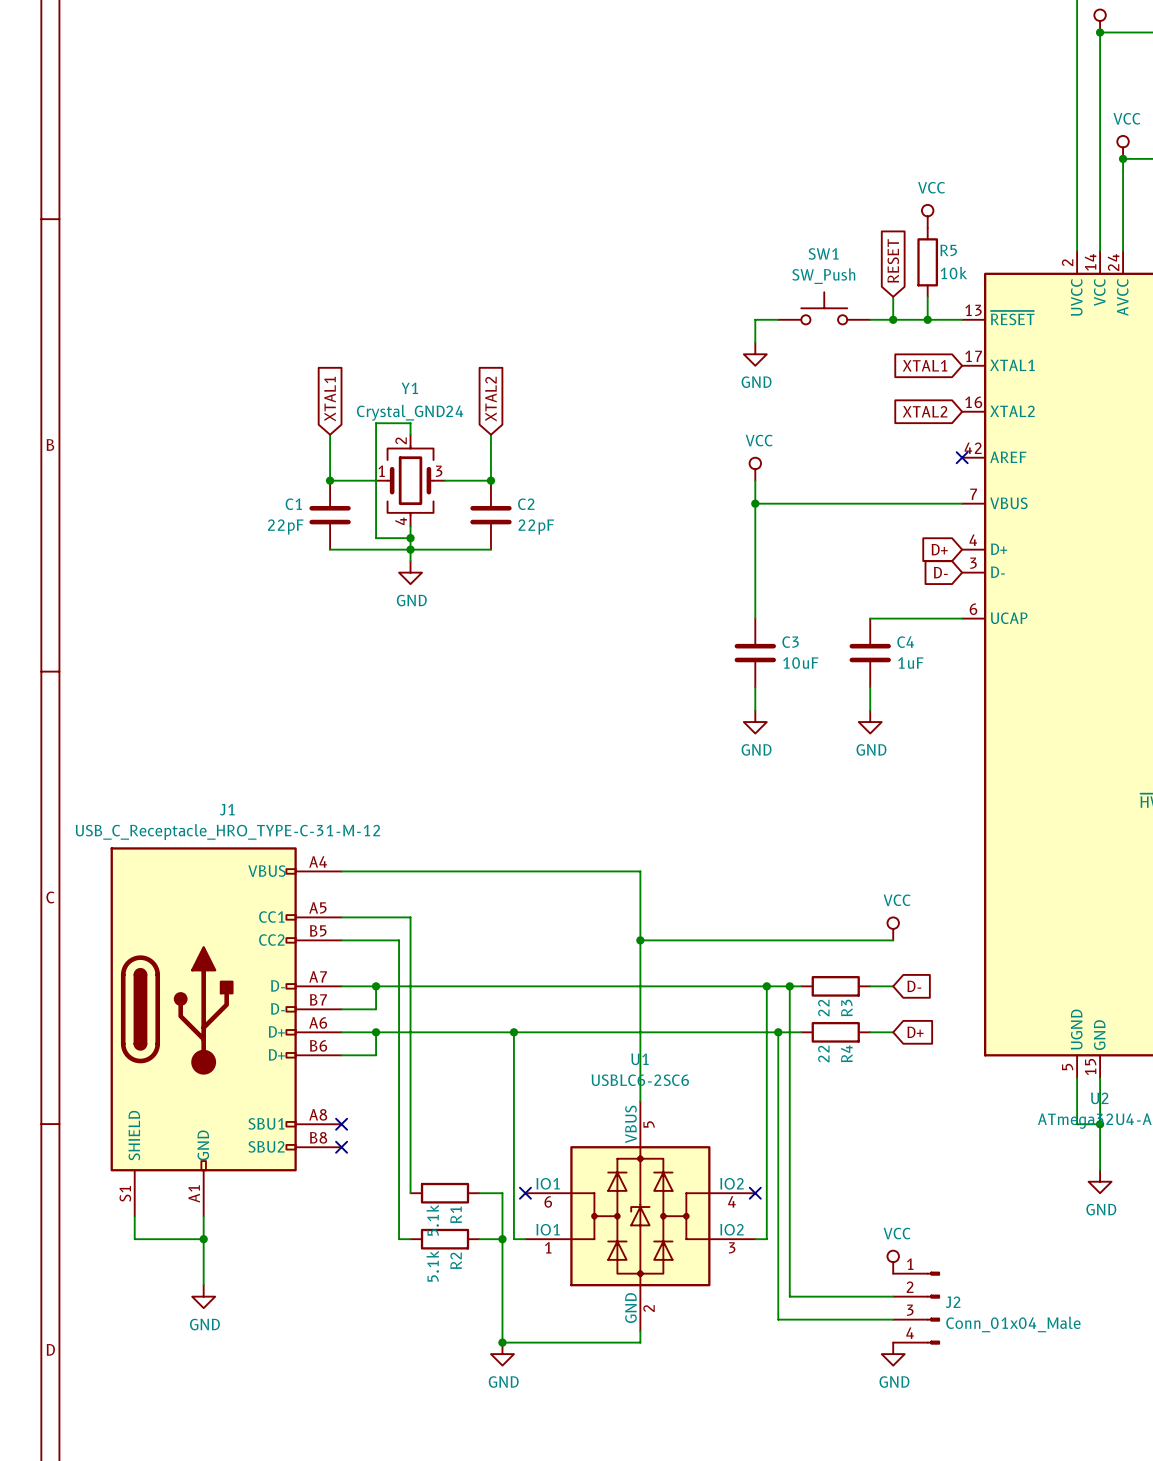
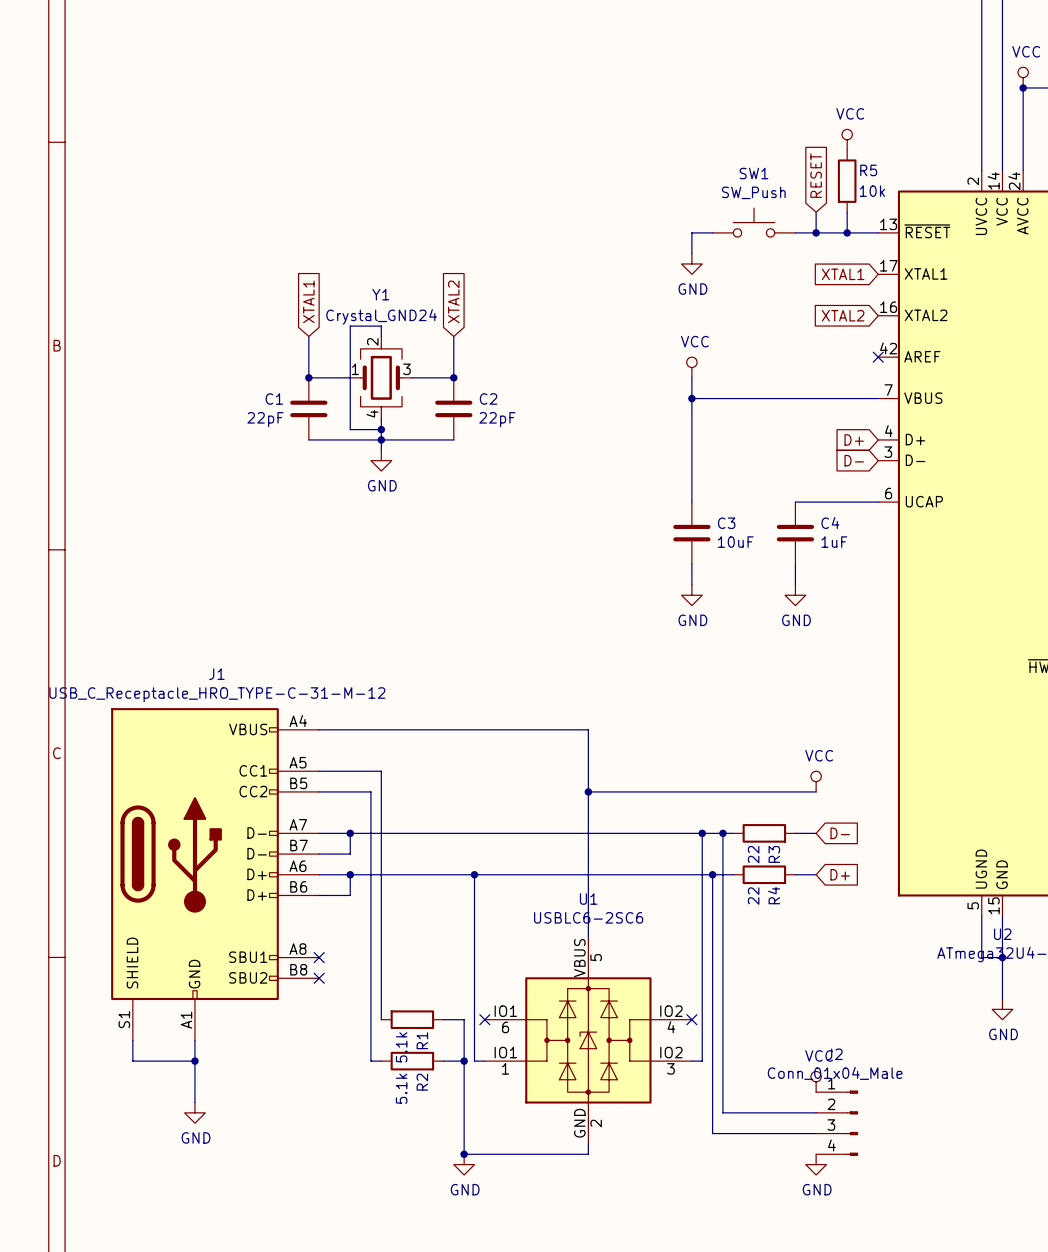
J2 name position: J2 (953, 1302) -> J2 (834, 1054)
J2 value position: Conn_01x04_Male (1013, 1324) -> Conn_01x04_Male (835, 1073)

